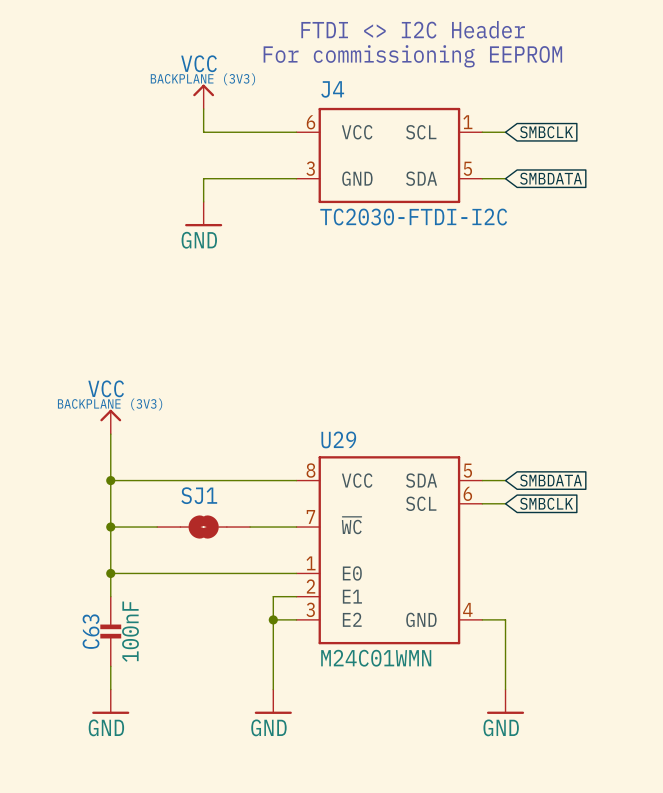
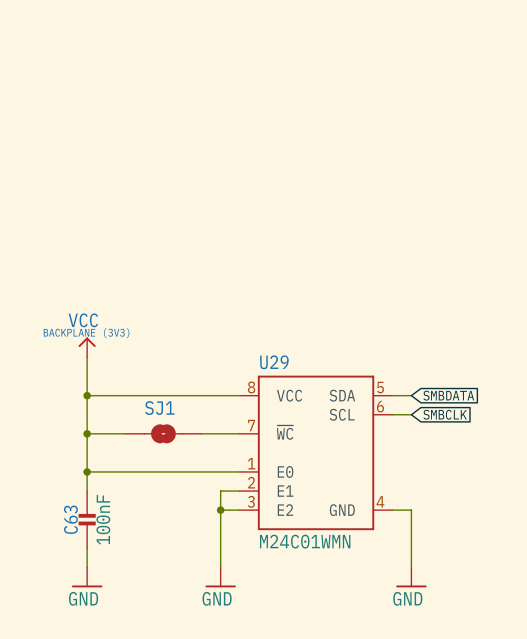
text: FTDI <> I2C Header (413, 29) -> none
text: For commissioning EEPROM (412, 56) -> none
power symbol: (203, 96) -> none
wire: (203, 109) (203, 132) (296, 132) -> none
wire: (482, 132) (505, 132) -> none
global label: SMBCLK (546, 132) -> none
J4: TC2030-FTDI-I2C (389, 155) -> none
wire: (296, 178) (203, 178) (203, 201) -> none
wire: (482, 178) (505, 178) -> none
global label: SMBDATA (551, 178) -> none
power symbol: GND (203, 214) -> none

